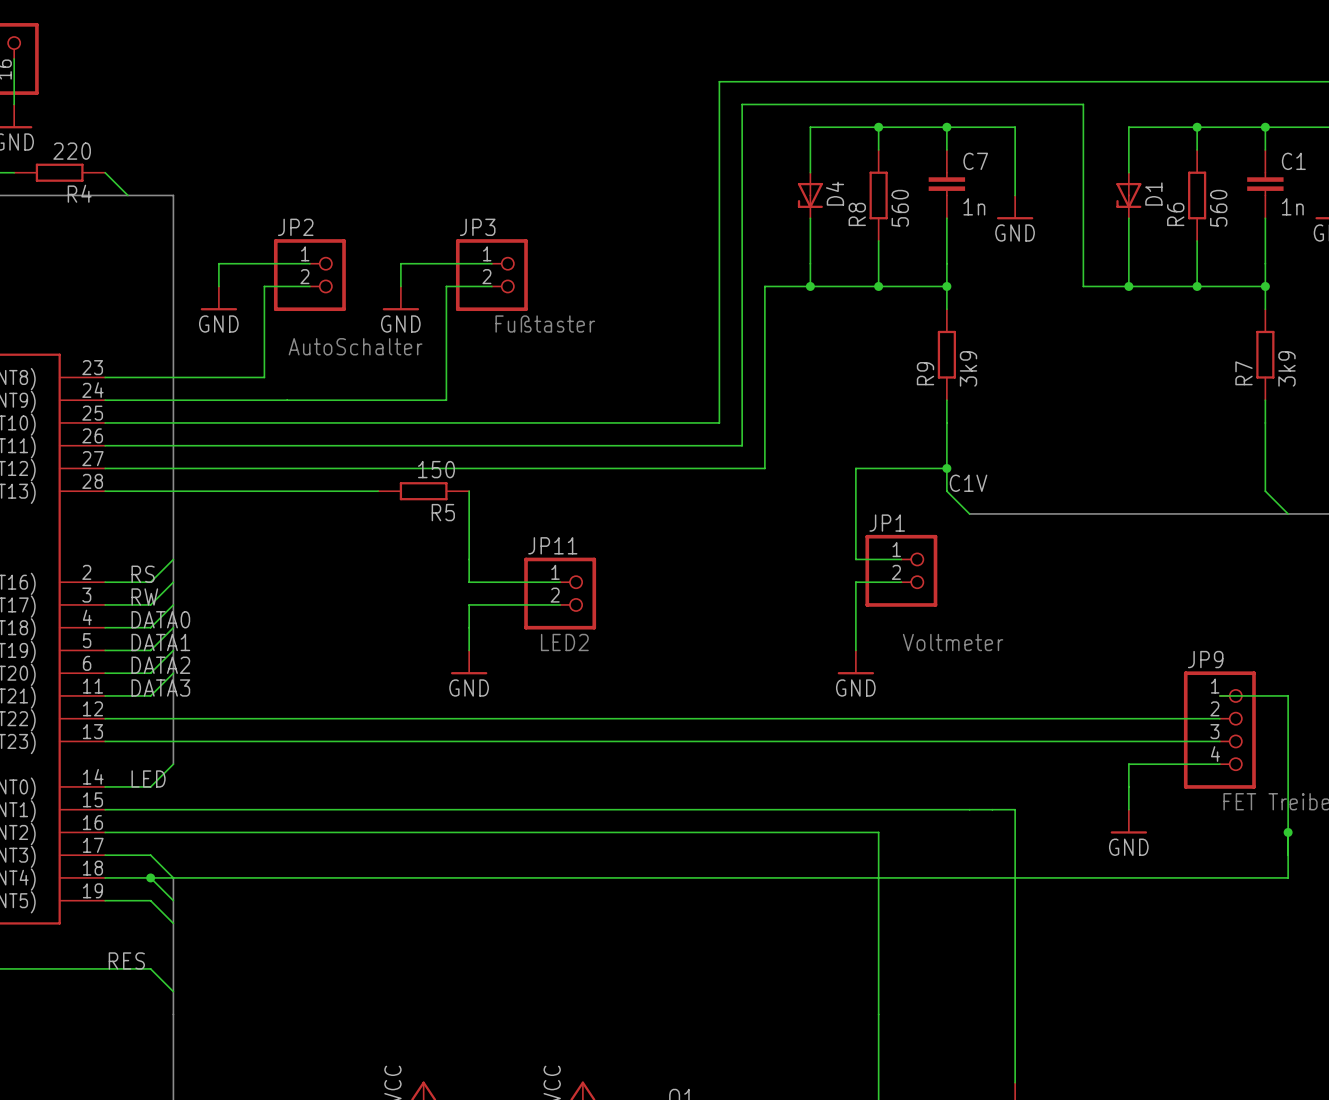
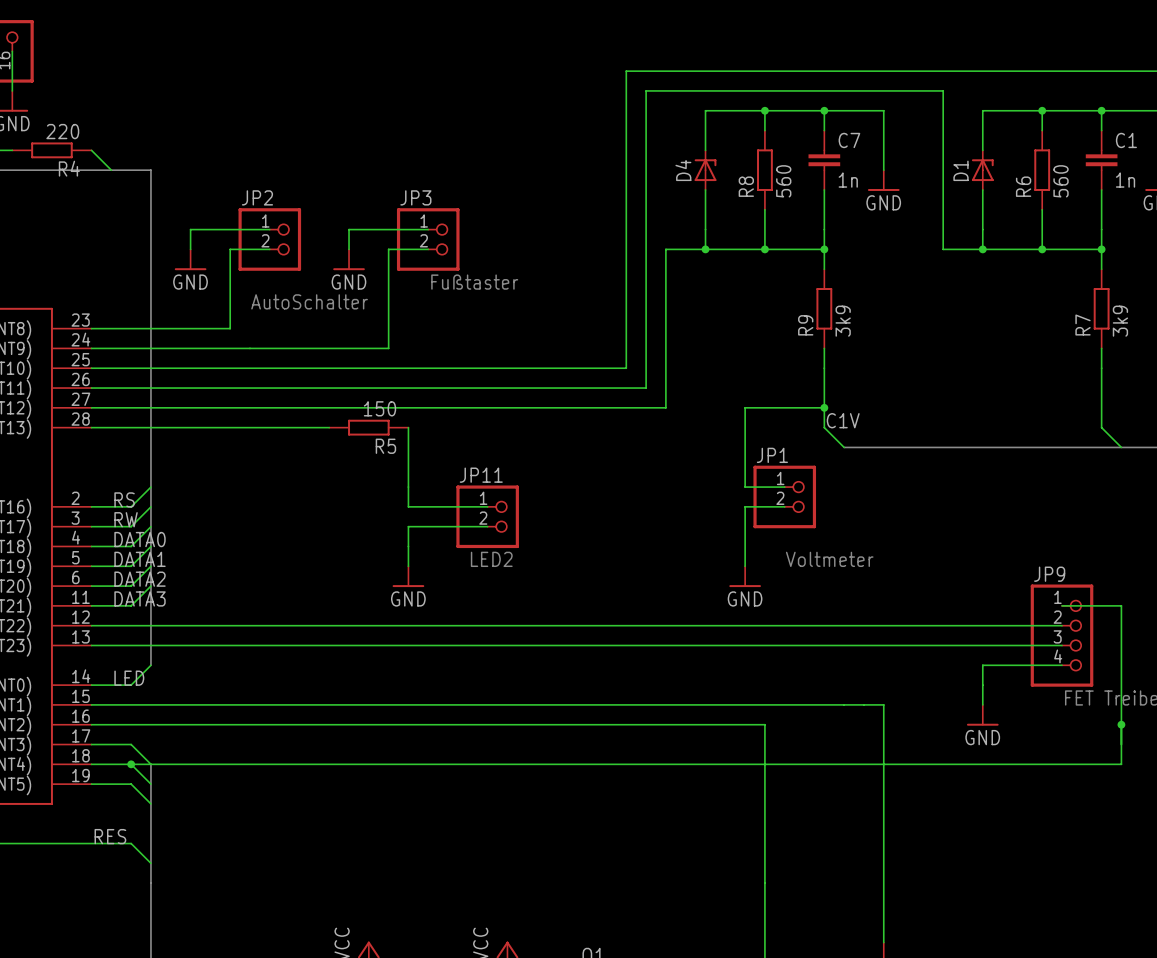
D4 rotation: 0° (810, 195) -> 180° (705, 170)
D1 rotation: 0° (1128, 195) -> 180° (982, 170)

